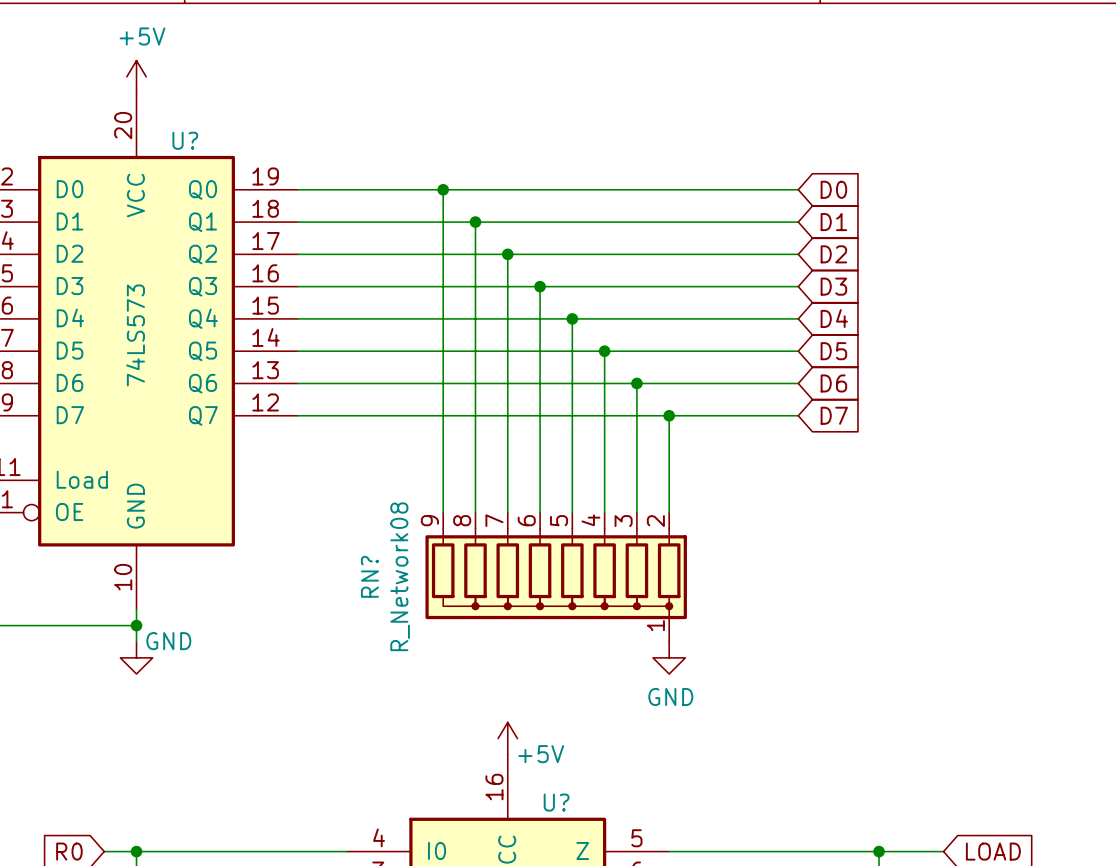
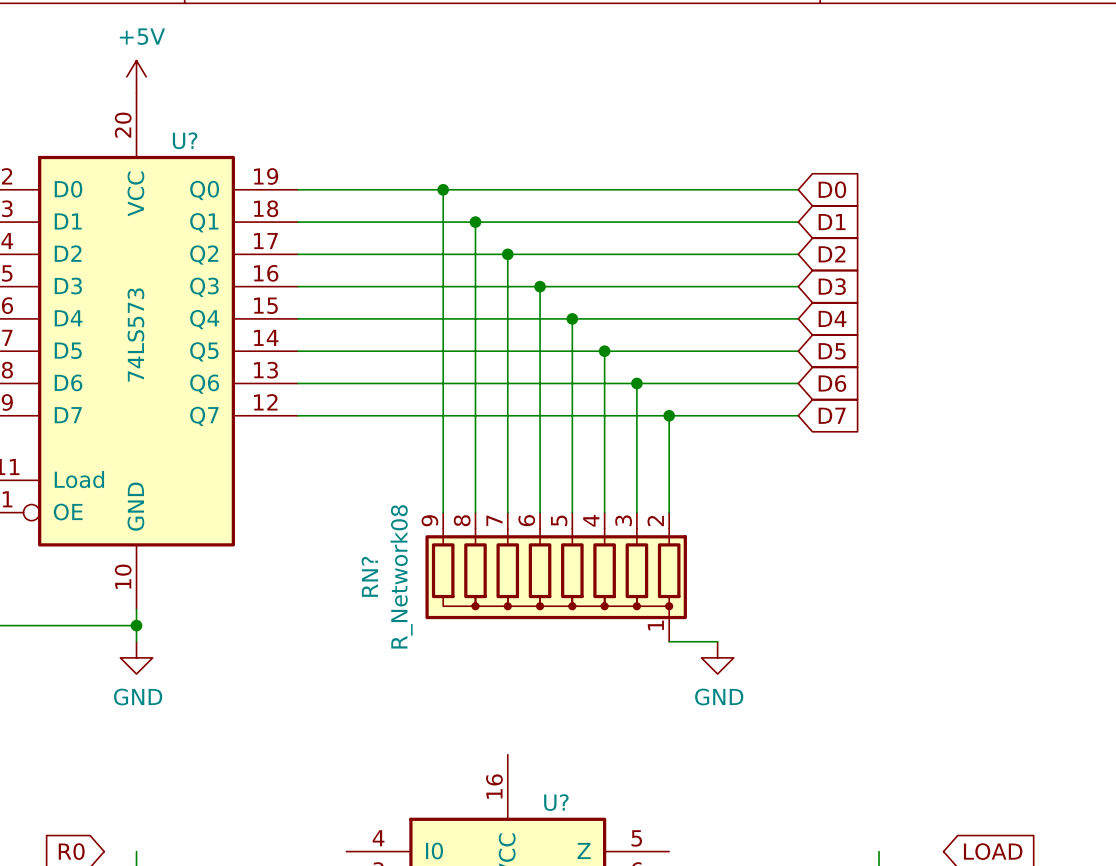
power symbol text position: GND (168, 641) -> GND (138, 697)
wire: none -> (669, 641) (717, 641)
power symbol position: GND (669, 657) -> GND (717, 657)
power symbol: +5V (507, 738) -> none
wire: (104, 851) (346, 851) -> none
junction: (136, 851) -> none
wire: (669, 851) (943, 851) -> none
junction: (879, 851) -> none

